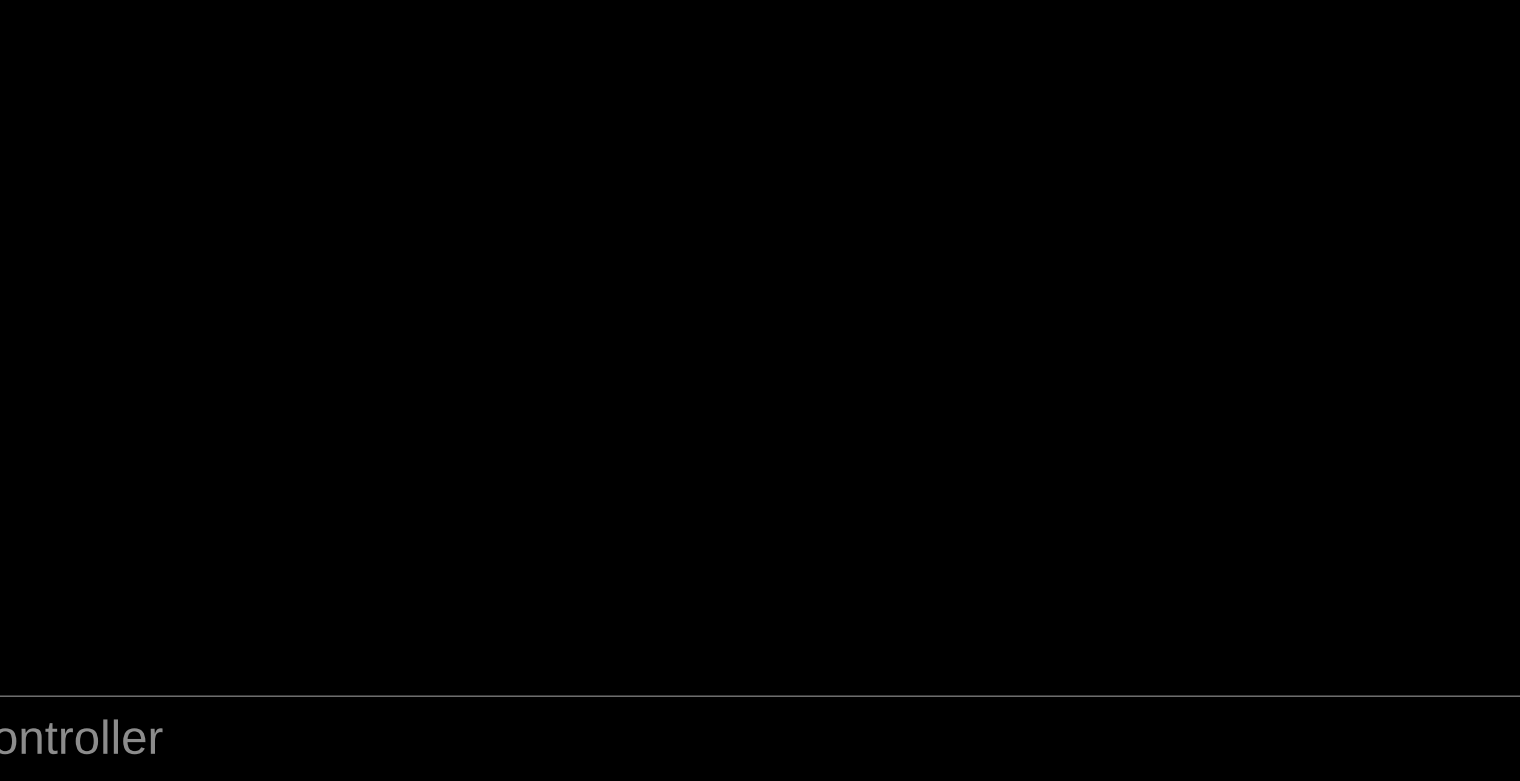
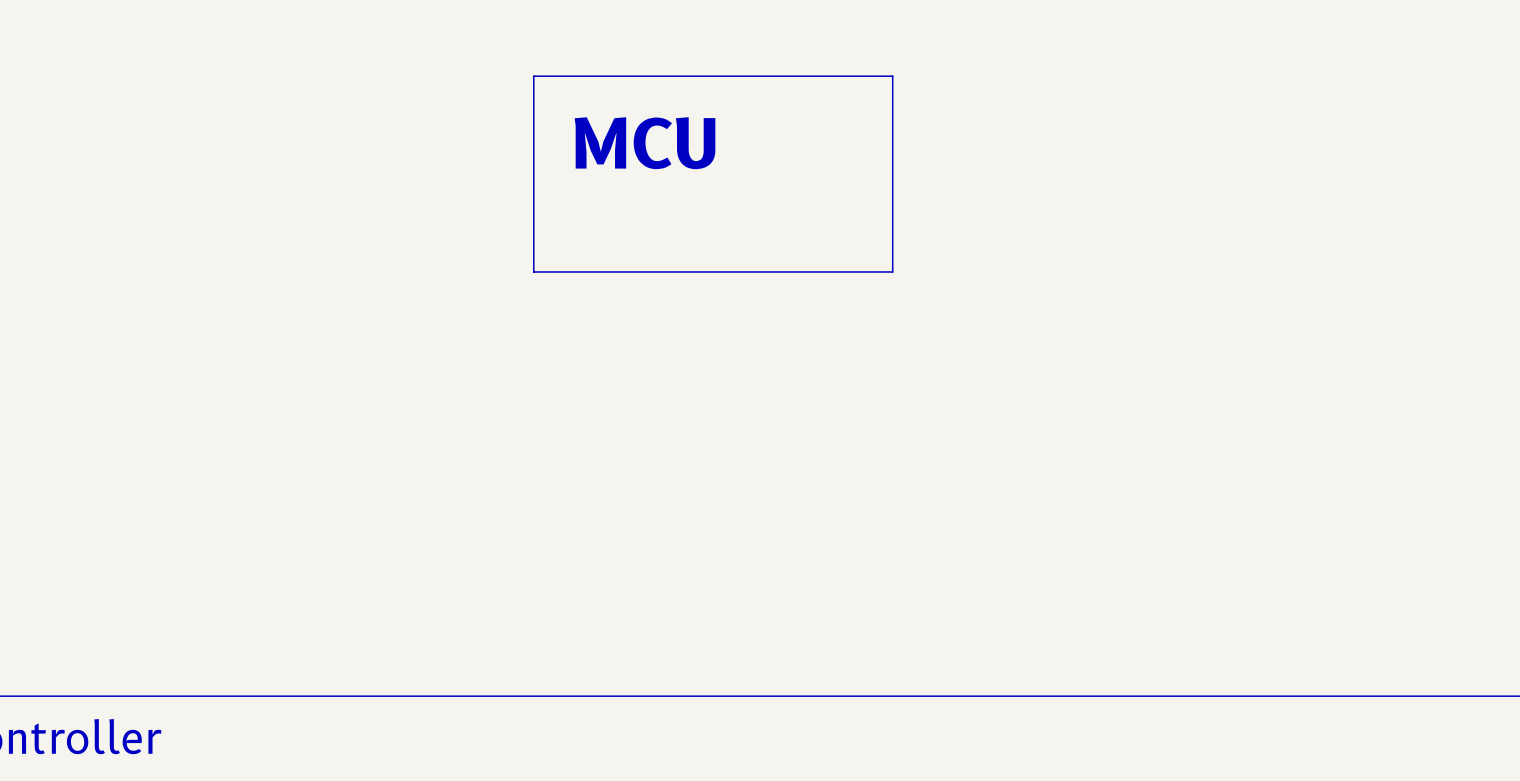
line: none -> (533, 76) (892, 76) (892, 271) (533, 271) (533, 76)
text: none -> MCU (645, 143)

